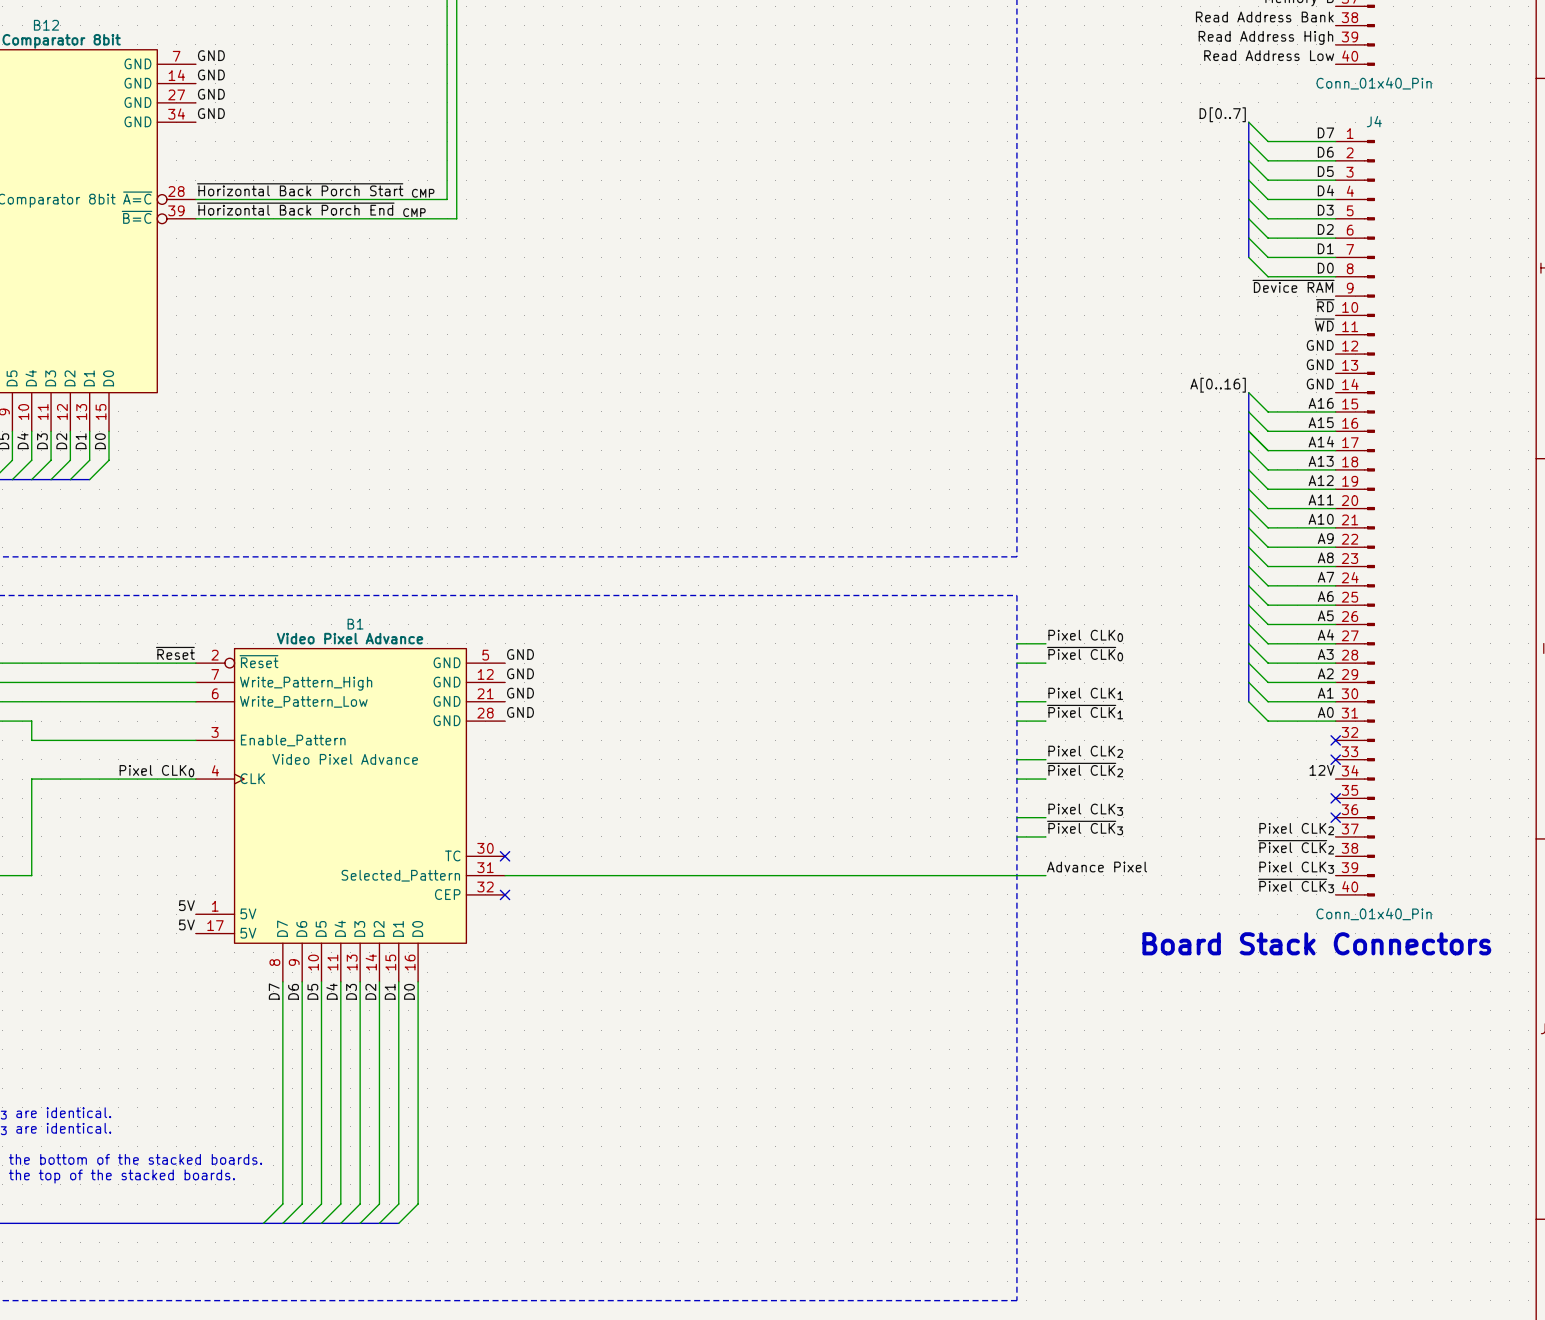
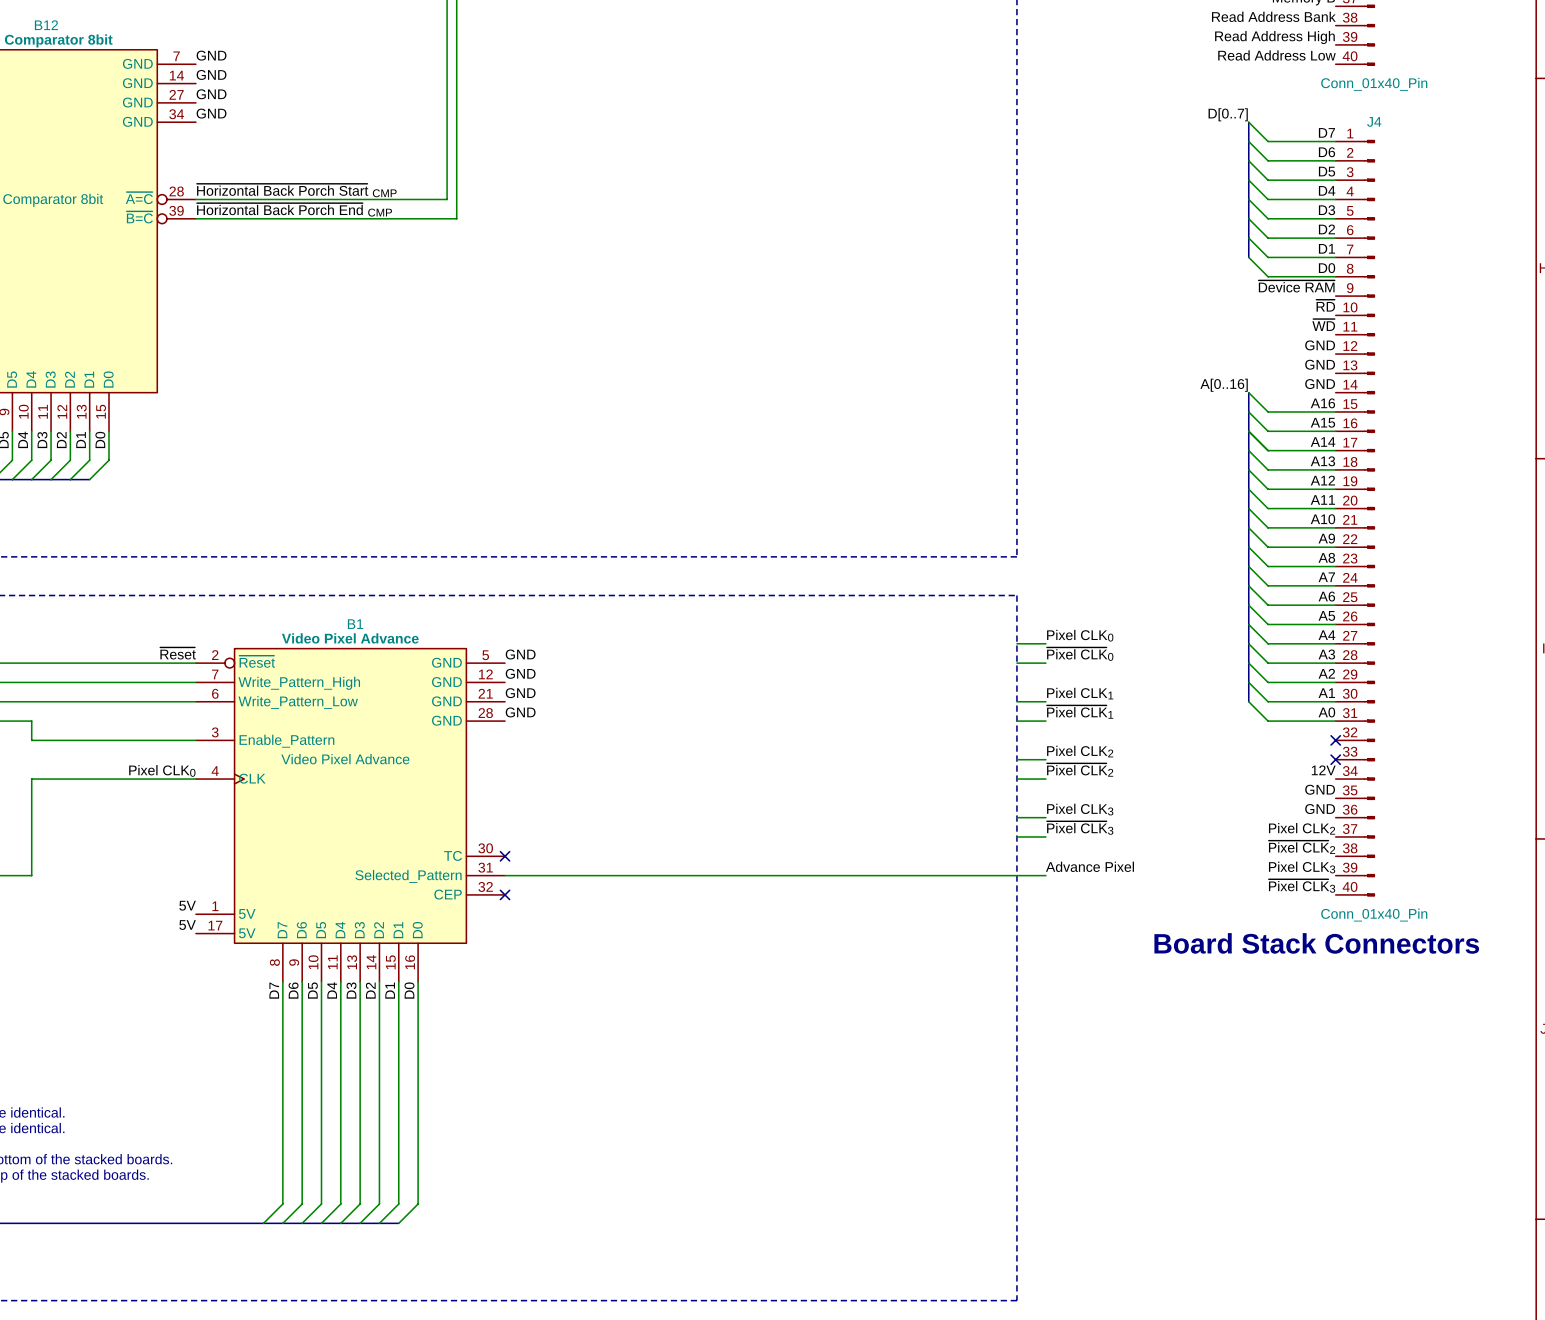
label: none -> GND (1320, 789)
no-connect mark: (1335, 798) -> none
label: none -> GND (1320, 809)
no-connect mark: (1335, 817) -> none

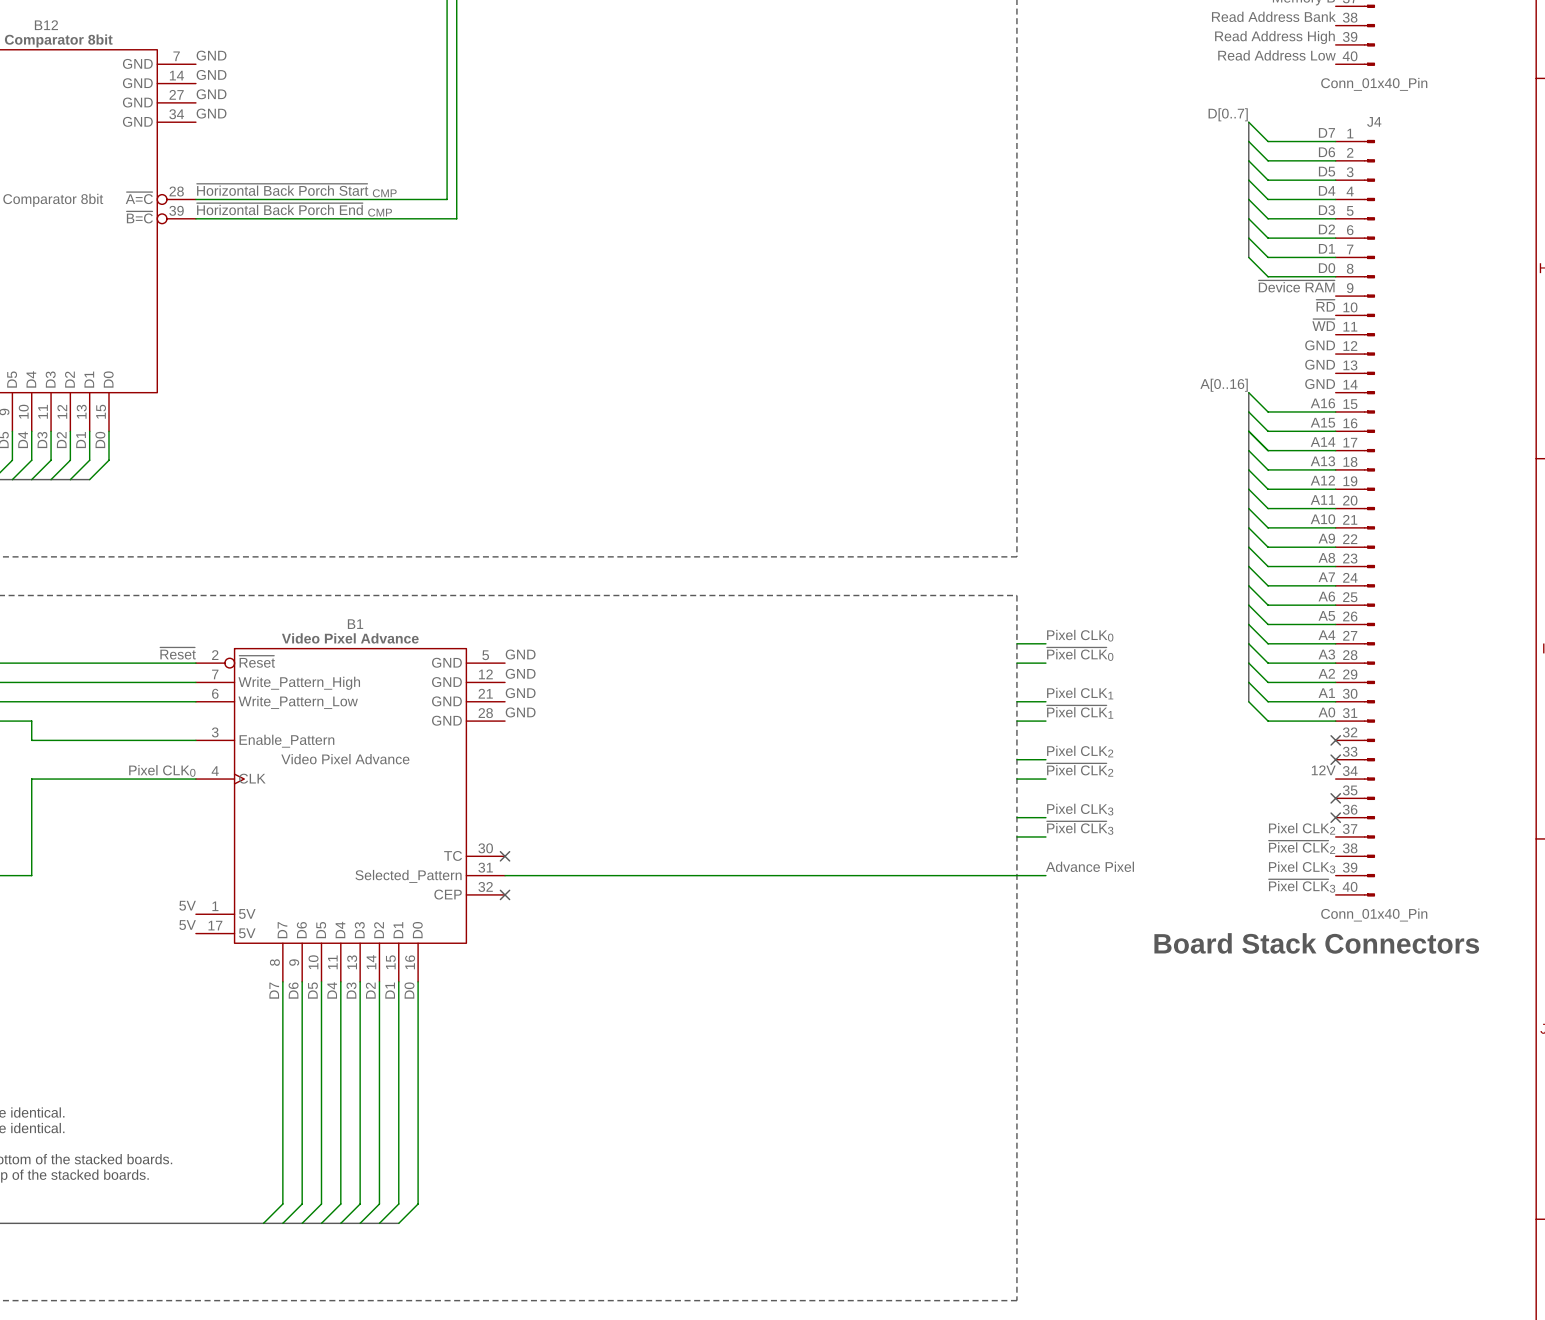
label: GND (1320, 789) -> none
no-connect mark: none -> (1335, 798)
label: GND (1320, 809) -> none
no-connect mark: none -> (1335, 817)

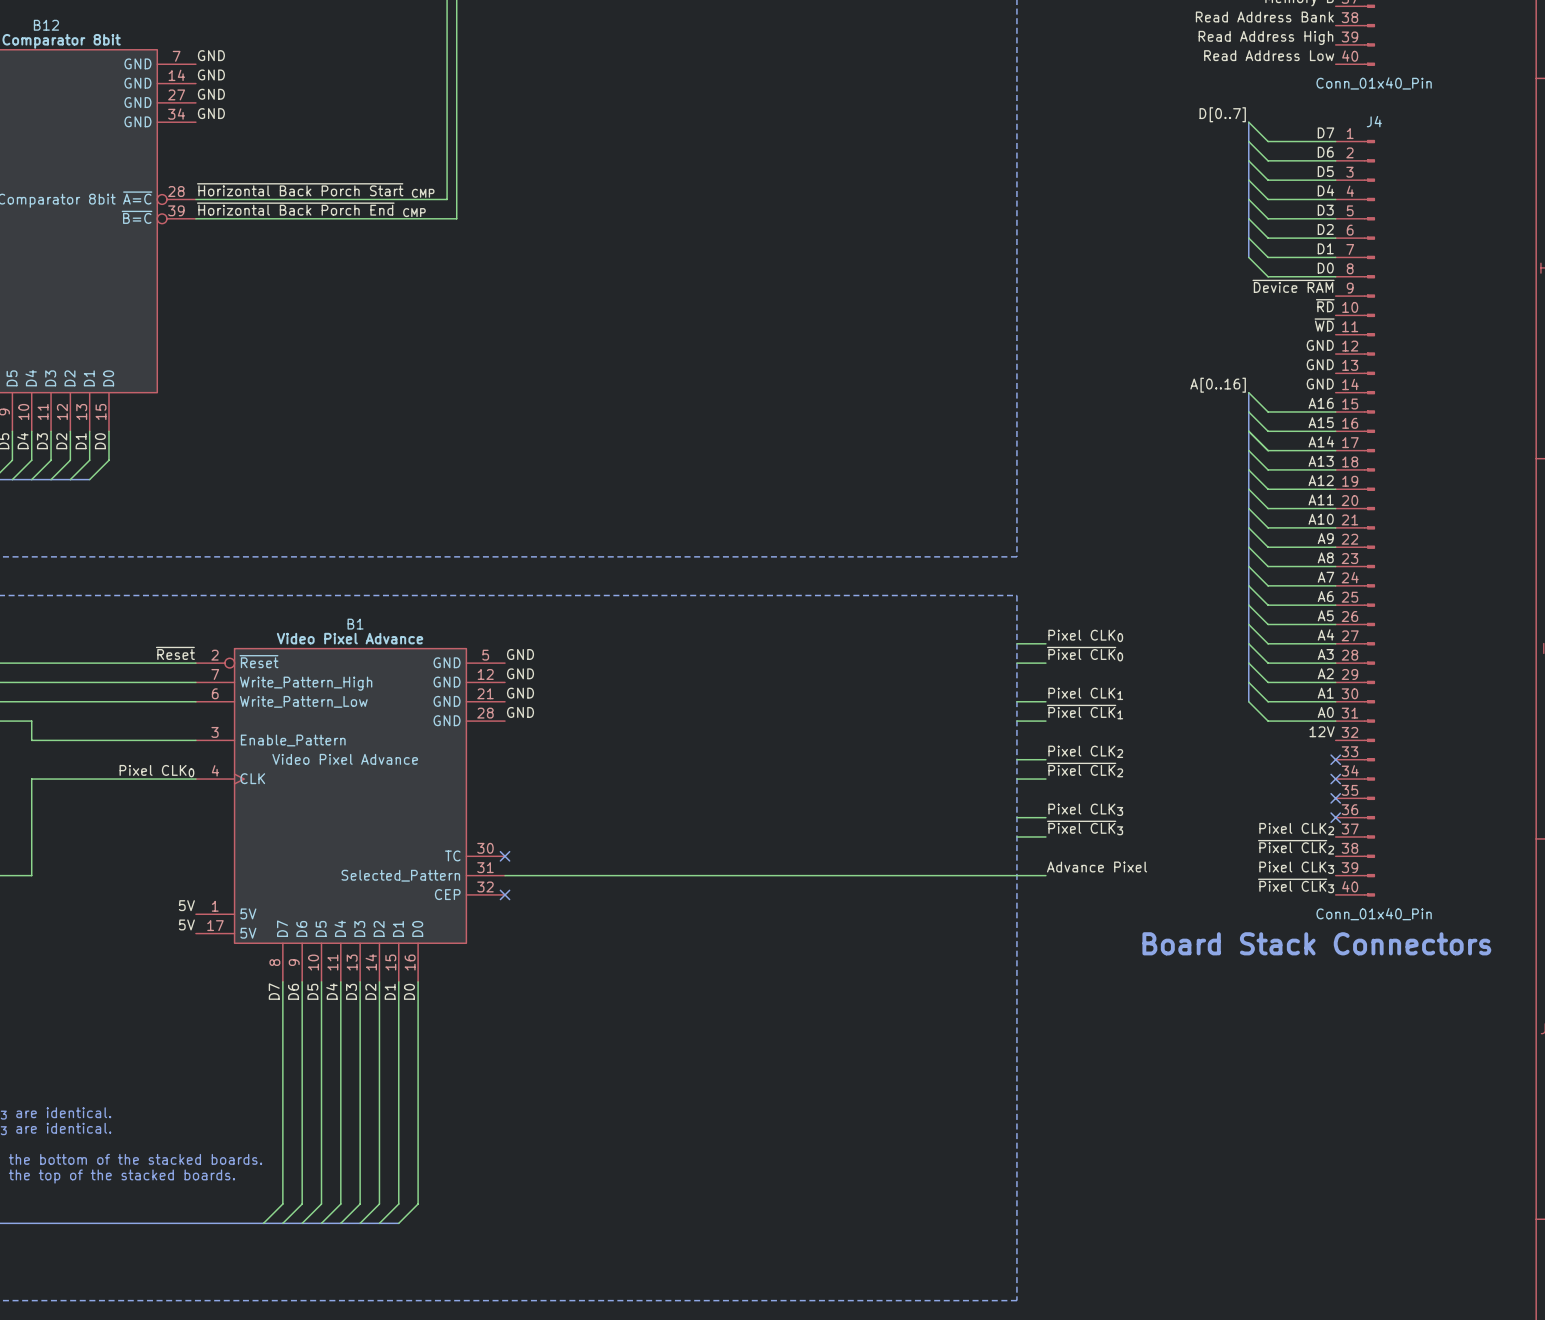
no-connect mark position: (1335, 740) -> (1335, 779)
label position: 12V (1323, 770) -> 12V (1322, 731)

